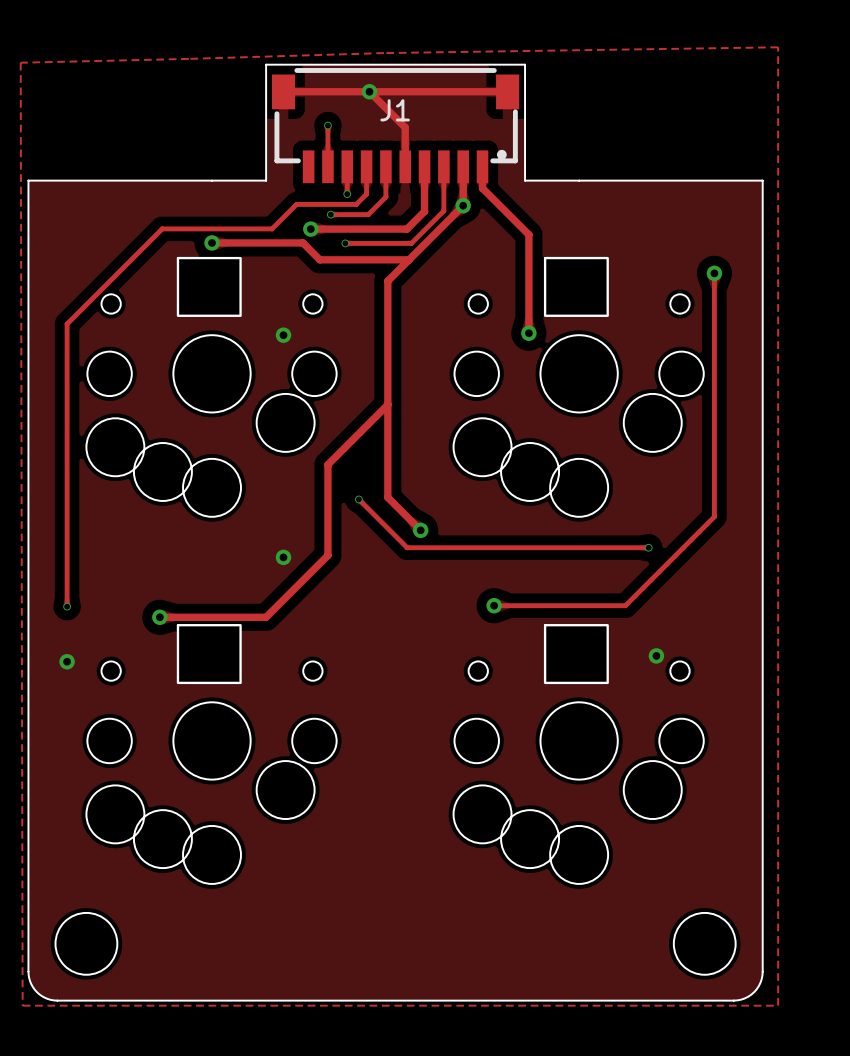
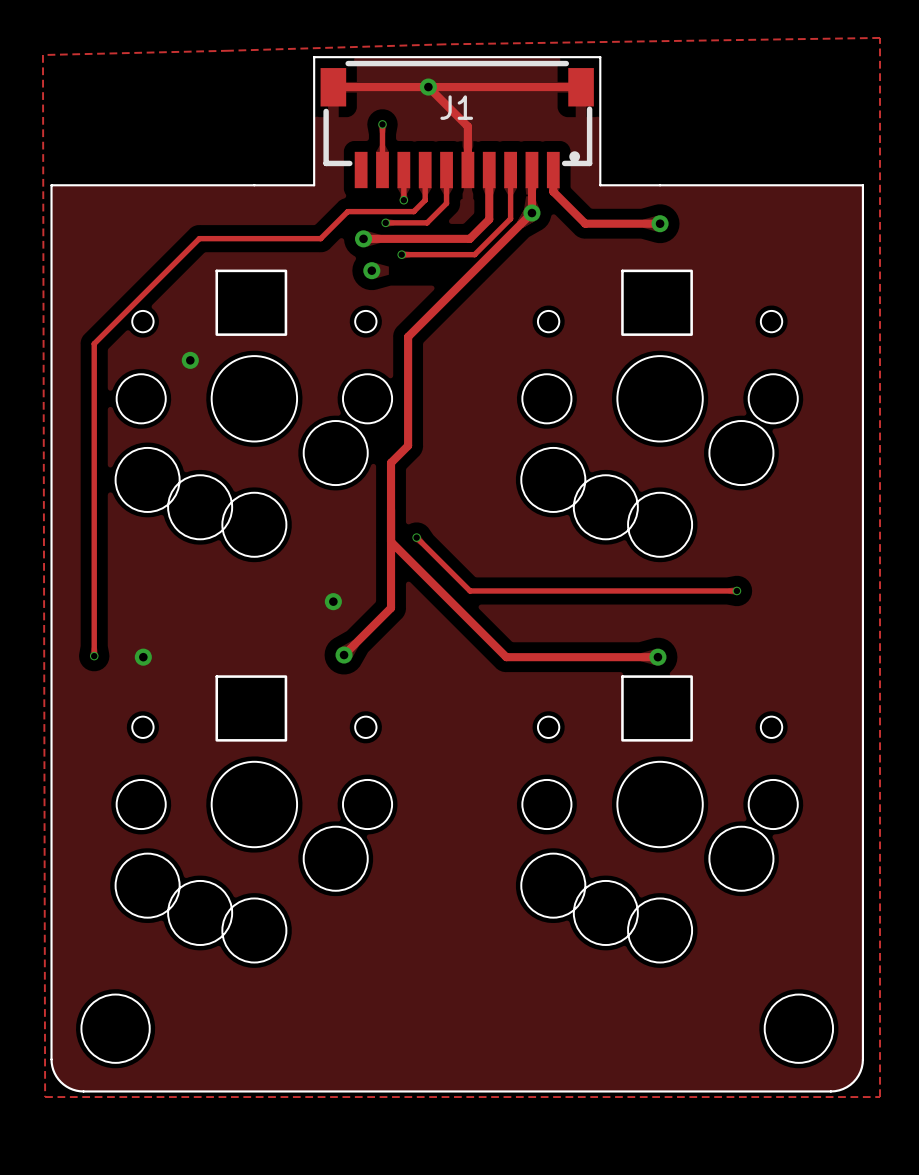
track: (482, 186) (528, 234) (528, 333) -> (553, 191) (585, 223) (660, 223)
via: none -> (660, 223)
track: (212, 242) (303, 242) (319, 259) (409, 259) -> none
via: (212, 242) -> none
via: none -> (371, 270)
track: (714, 273) (714, 516) (625, 605) (494, 605) -> none
via: (714, 273) -> none
track: (387, 281) (387, 497) (420, 530) -> (448, 296) (408, 336) (408, 445) (391, 462) (391, 608) (344, 655)
via: (528, 333) -> none
via: (283, 335) -> none
via: none -> (190, 360)
track: (387, 404) (327, 464) (327, 555) (266, 617) (159, 617) -> none
track: none -> (391, 541) (506, 657) (657, 657)
via: (420, 530) -> none
via: none -> (344, 655)
via: (494, 605) -> none
via: none -> (143, 657)
via: none -> (657, 657)
via: (159, 617) -> none
via: (656, 655) -> none
via: (67, 661) -> none

